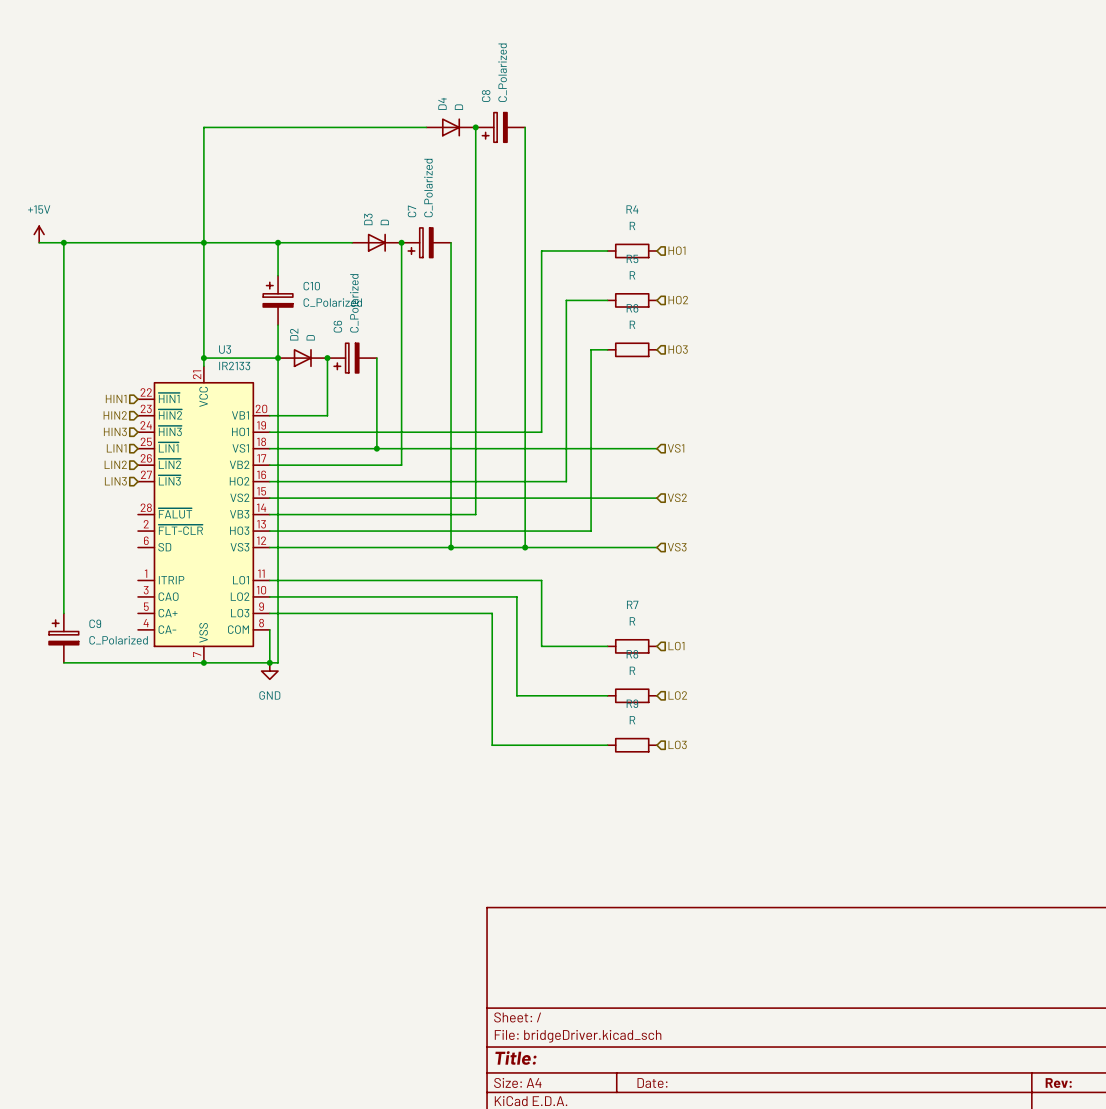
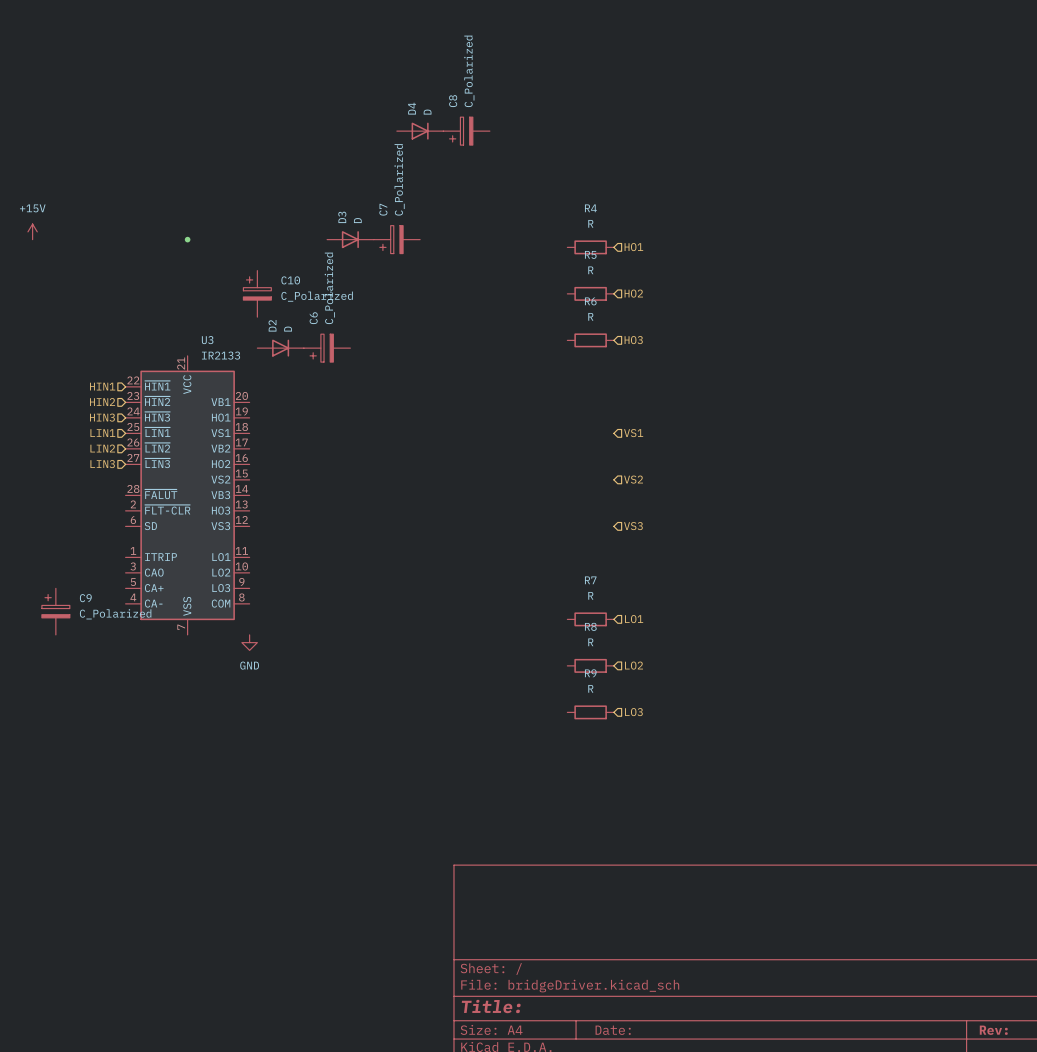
wire: (426, 127) (203, 127) (203, 366) -> none
wire: (475, 127) (475, 514) (269, 514) -> none
junction: (475, 127) -> none
wire: (525, 127) (525, 547) -> none
wire: (39, 242) (352, 242) -> none
wire: (63, 242) (63, 613) -> none
junction: (63, 242) -> none
wire: (278, 242) (278, 275) -> none
junction: (278, 242) -> none
wire: (401, 242) (401, 465) (269, 465) -> none
junction: (401, 242) -> none
wire: (451, 242) (451, 547) -> none
wire: (607, 250) (541, 250) (541, 432) (269, 432) -> none
wire: (607, 300) (566, 300) (566, 481) (269, 481) -> none
wire: (278, 325) (278, 662) (63, 662) -> none
wire: (607, 349) (591, 349) (591, 531) (269, 531) -> none
wire: (203, 358) (278, 358) -> none
junction: (203, 358) -> none
junction: (278, 358) -> none
wire: (327, 358) (327, 415) (269, 415) -> none
junction: (327, 358) -> none
wire: (376, 358) (376, 448) -> none
wire: (269, 448) (656, 448) -> none
junction: (376, 448) -> none
wire: (269, 498) (656, 498) -> none
wire: (269, 547) (656, 547) -> none
junction: (451, 547) -> none
junction: (525, 547) -> none
wire: (269, 580) (541, 580) (541, 646) (607, 646) -> none
wire: (269, 596) (516, 596) (516, 695) (607, 695) -> none
wire: (269, 613) (492, 613) (492, 745) (607, 745) -> none
wire: (269, 629) (269, 662) -> none
junction: (203, 662) -> none
junction: (269, 662) -> none

